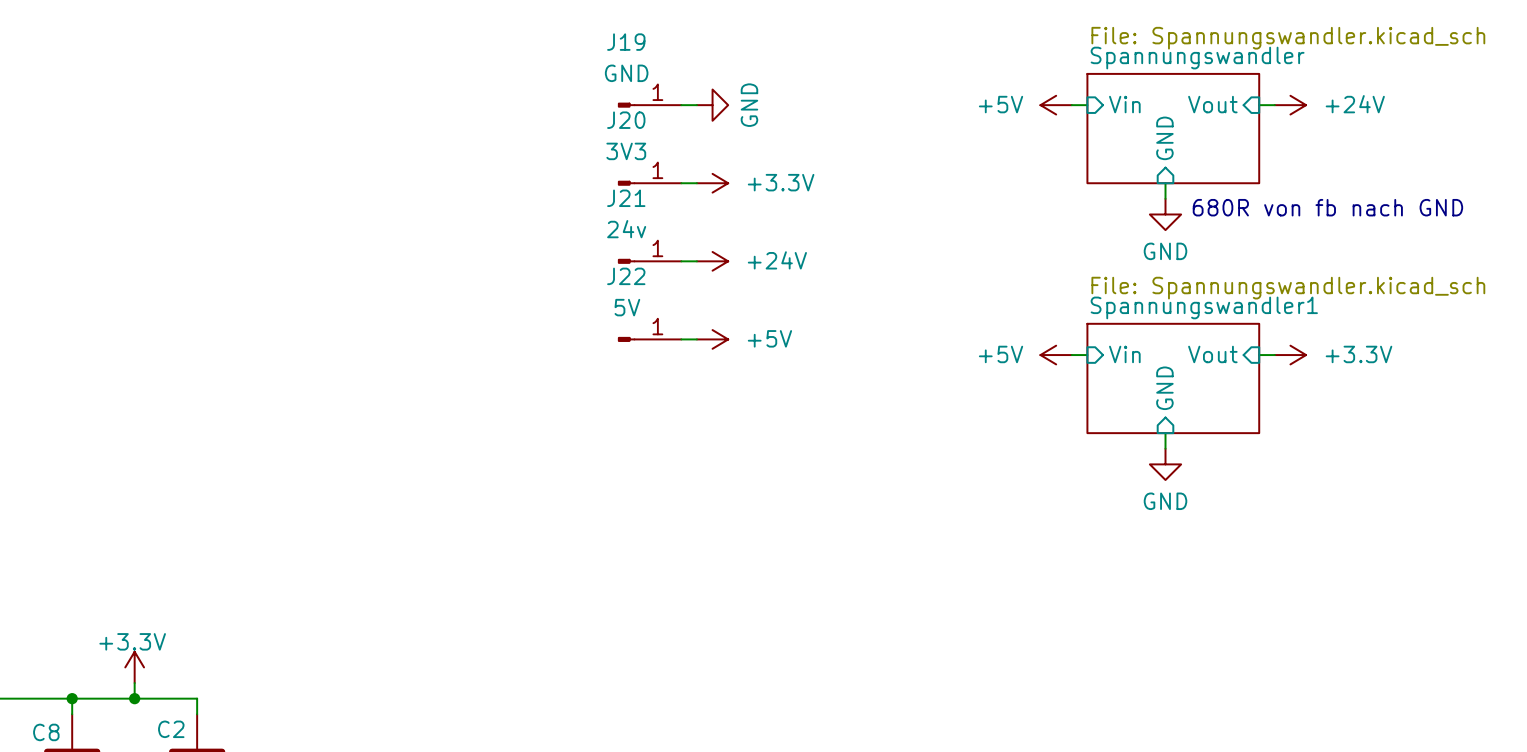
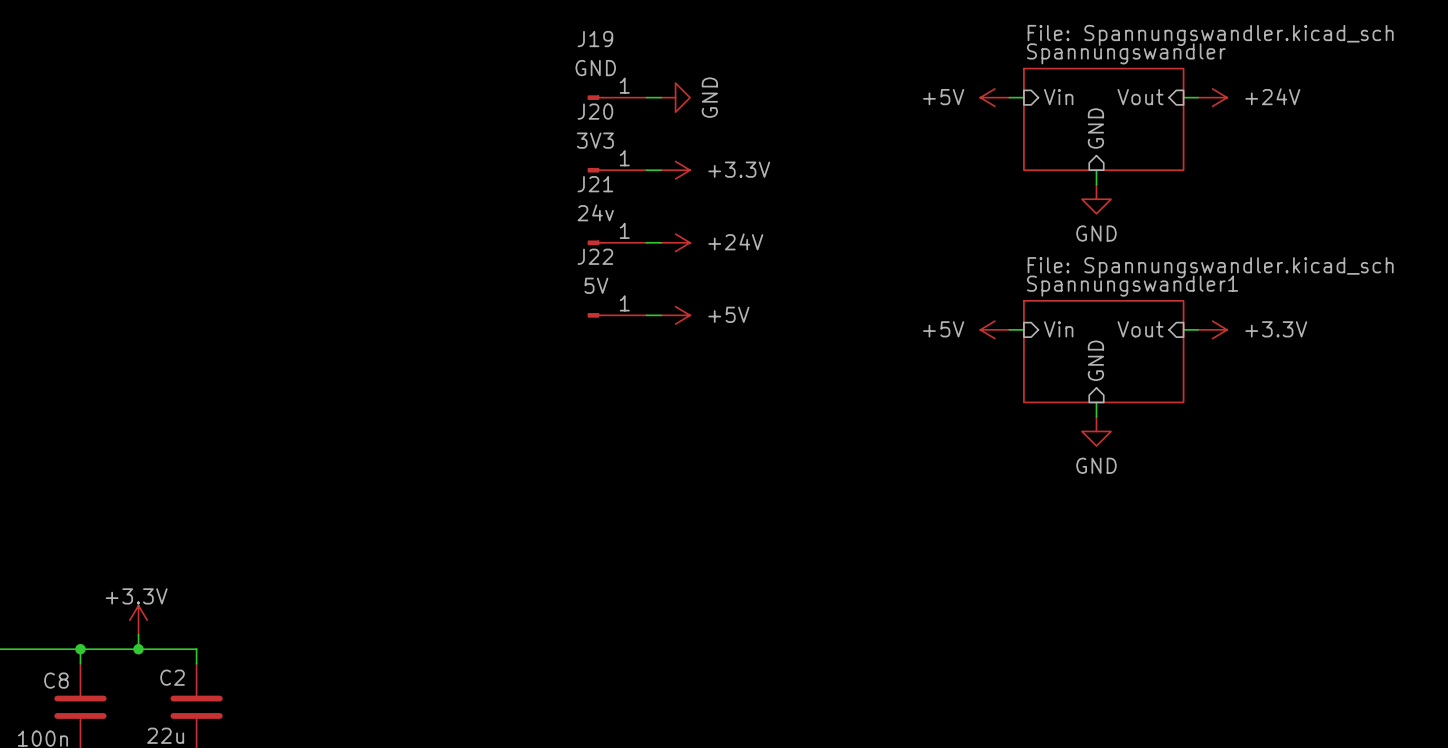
text: 680R von fb nach GND (1327, 207) -> none

